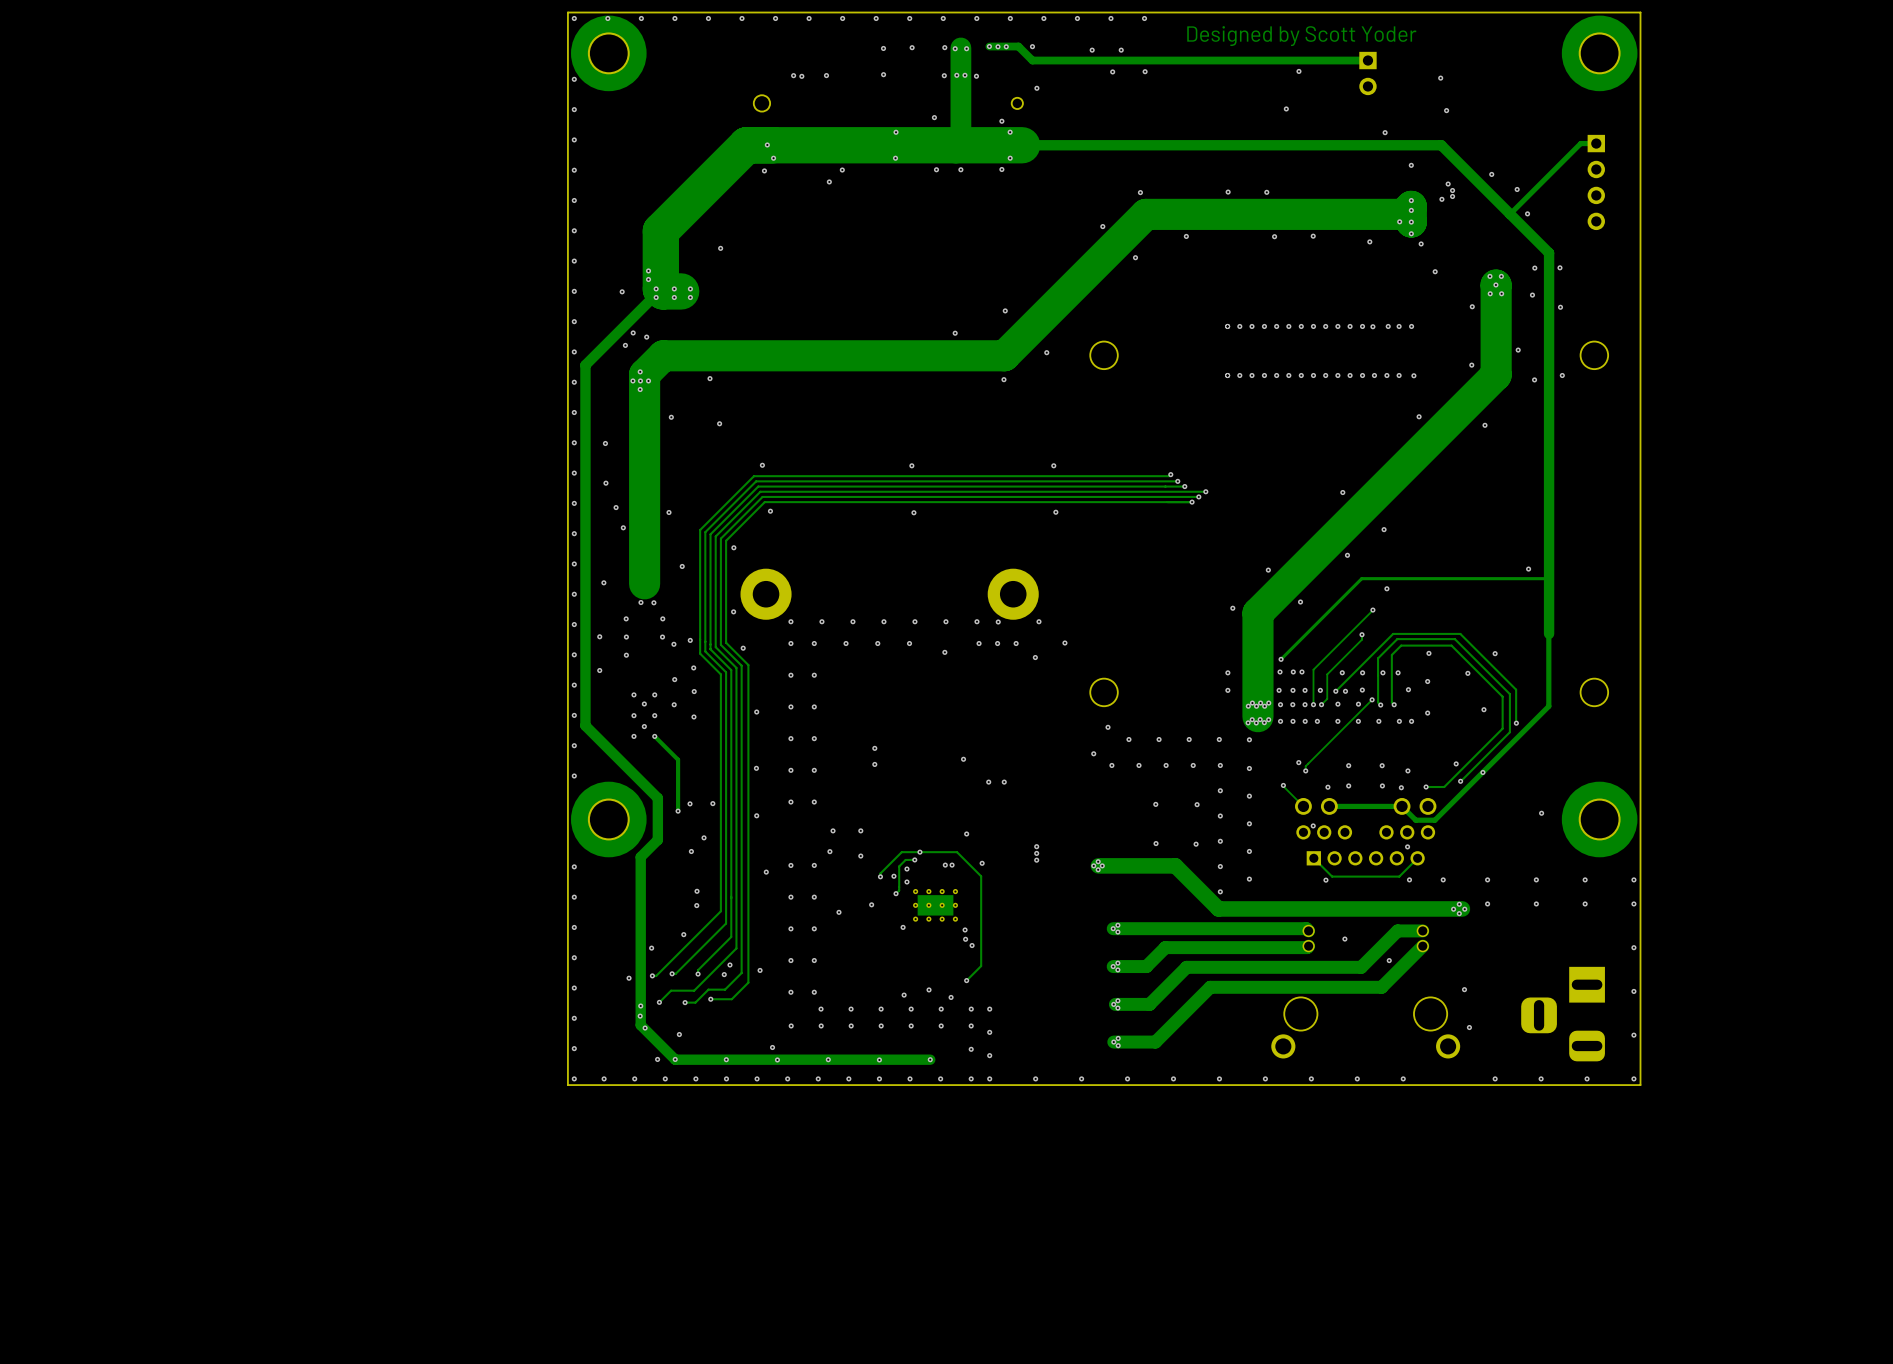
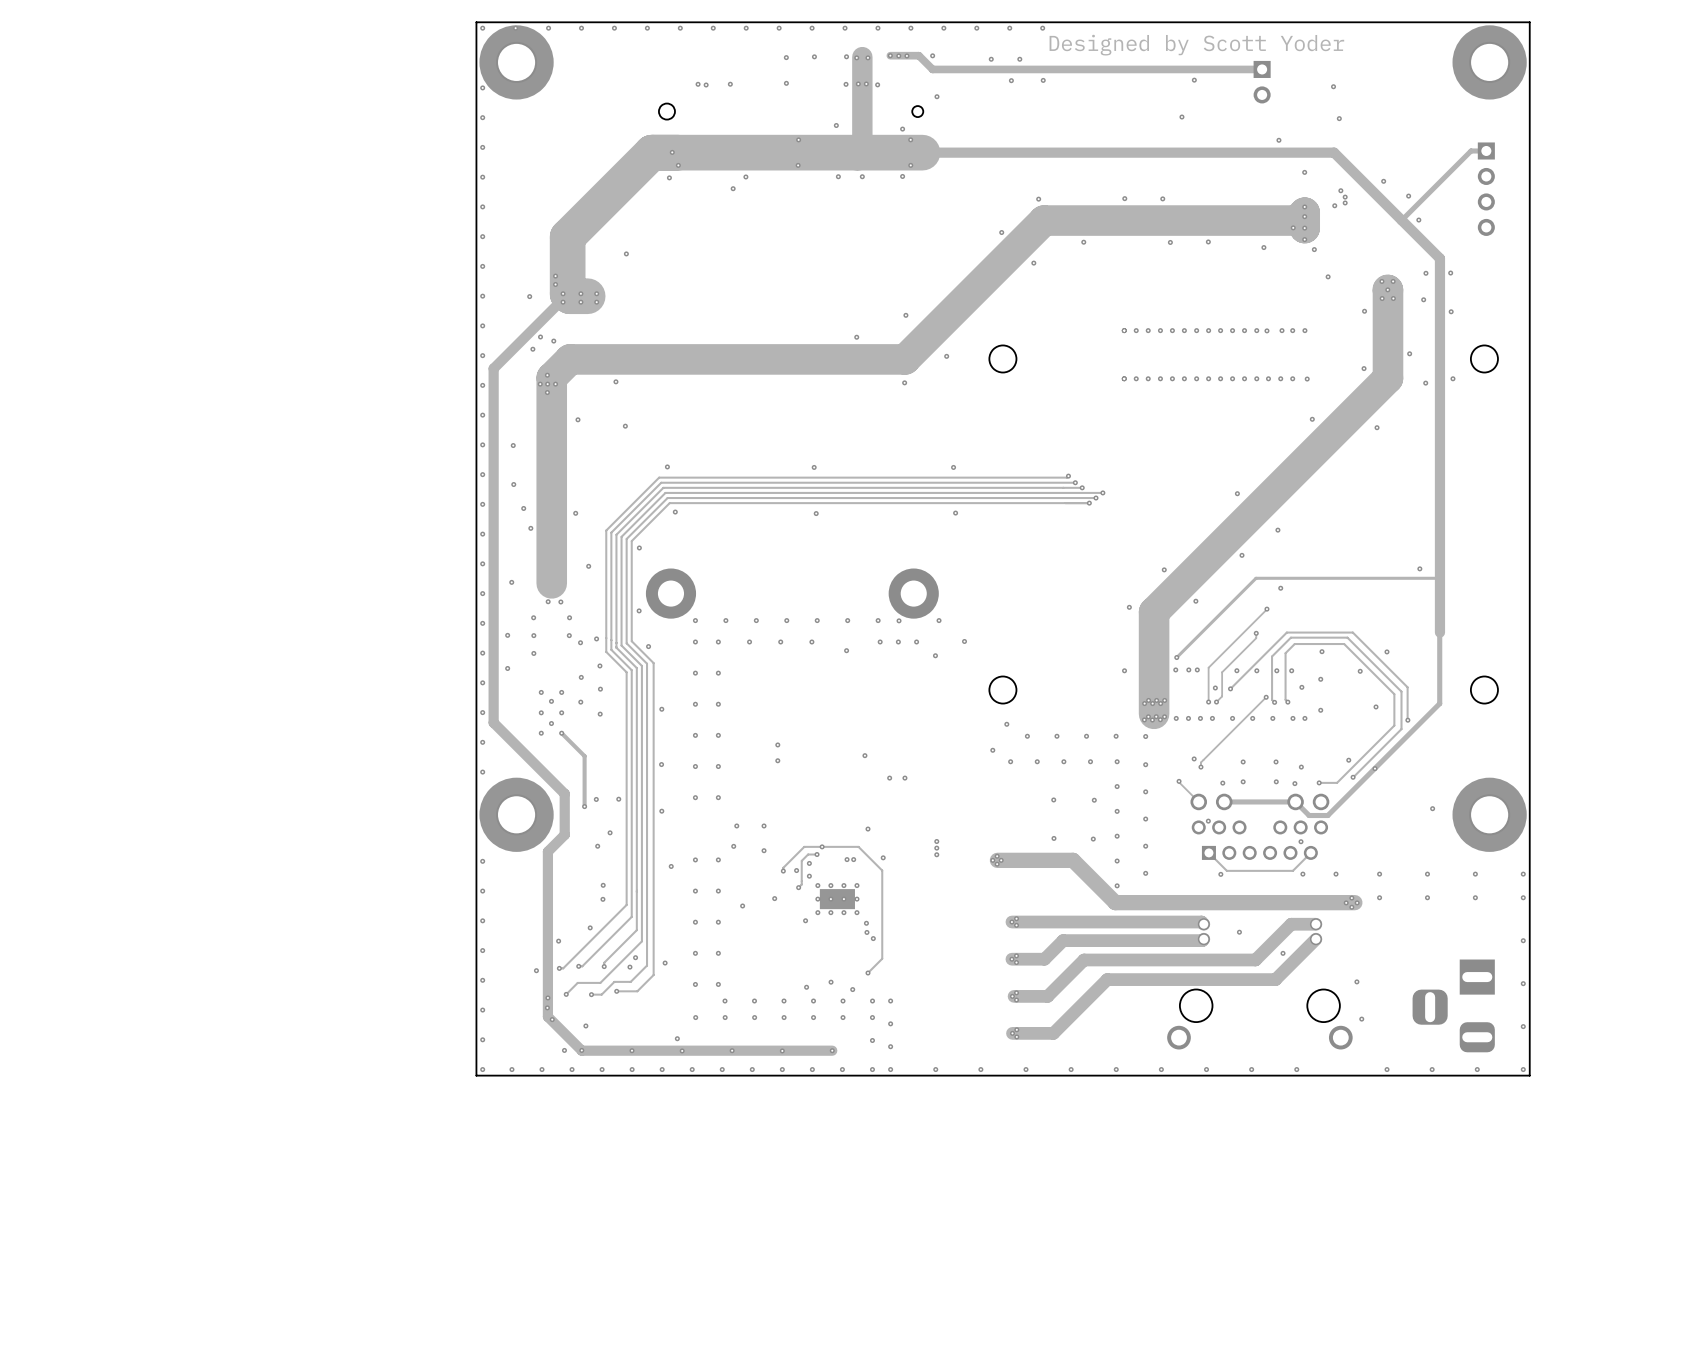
via: (1227, 690) -> none
via: (1279, 690) -> none
via: (1292, 690) -> none
via: (1305, 690) -> none
via: (1362, 690) -> none
via: (1345, 691) -> none
via: (1280, 704) -> none
via: (1292, 704) -> none
via: (1305, 704) -> none
via: (1337, 704) -> none
via: (1358, 704) -> none

